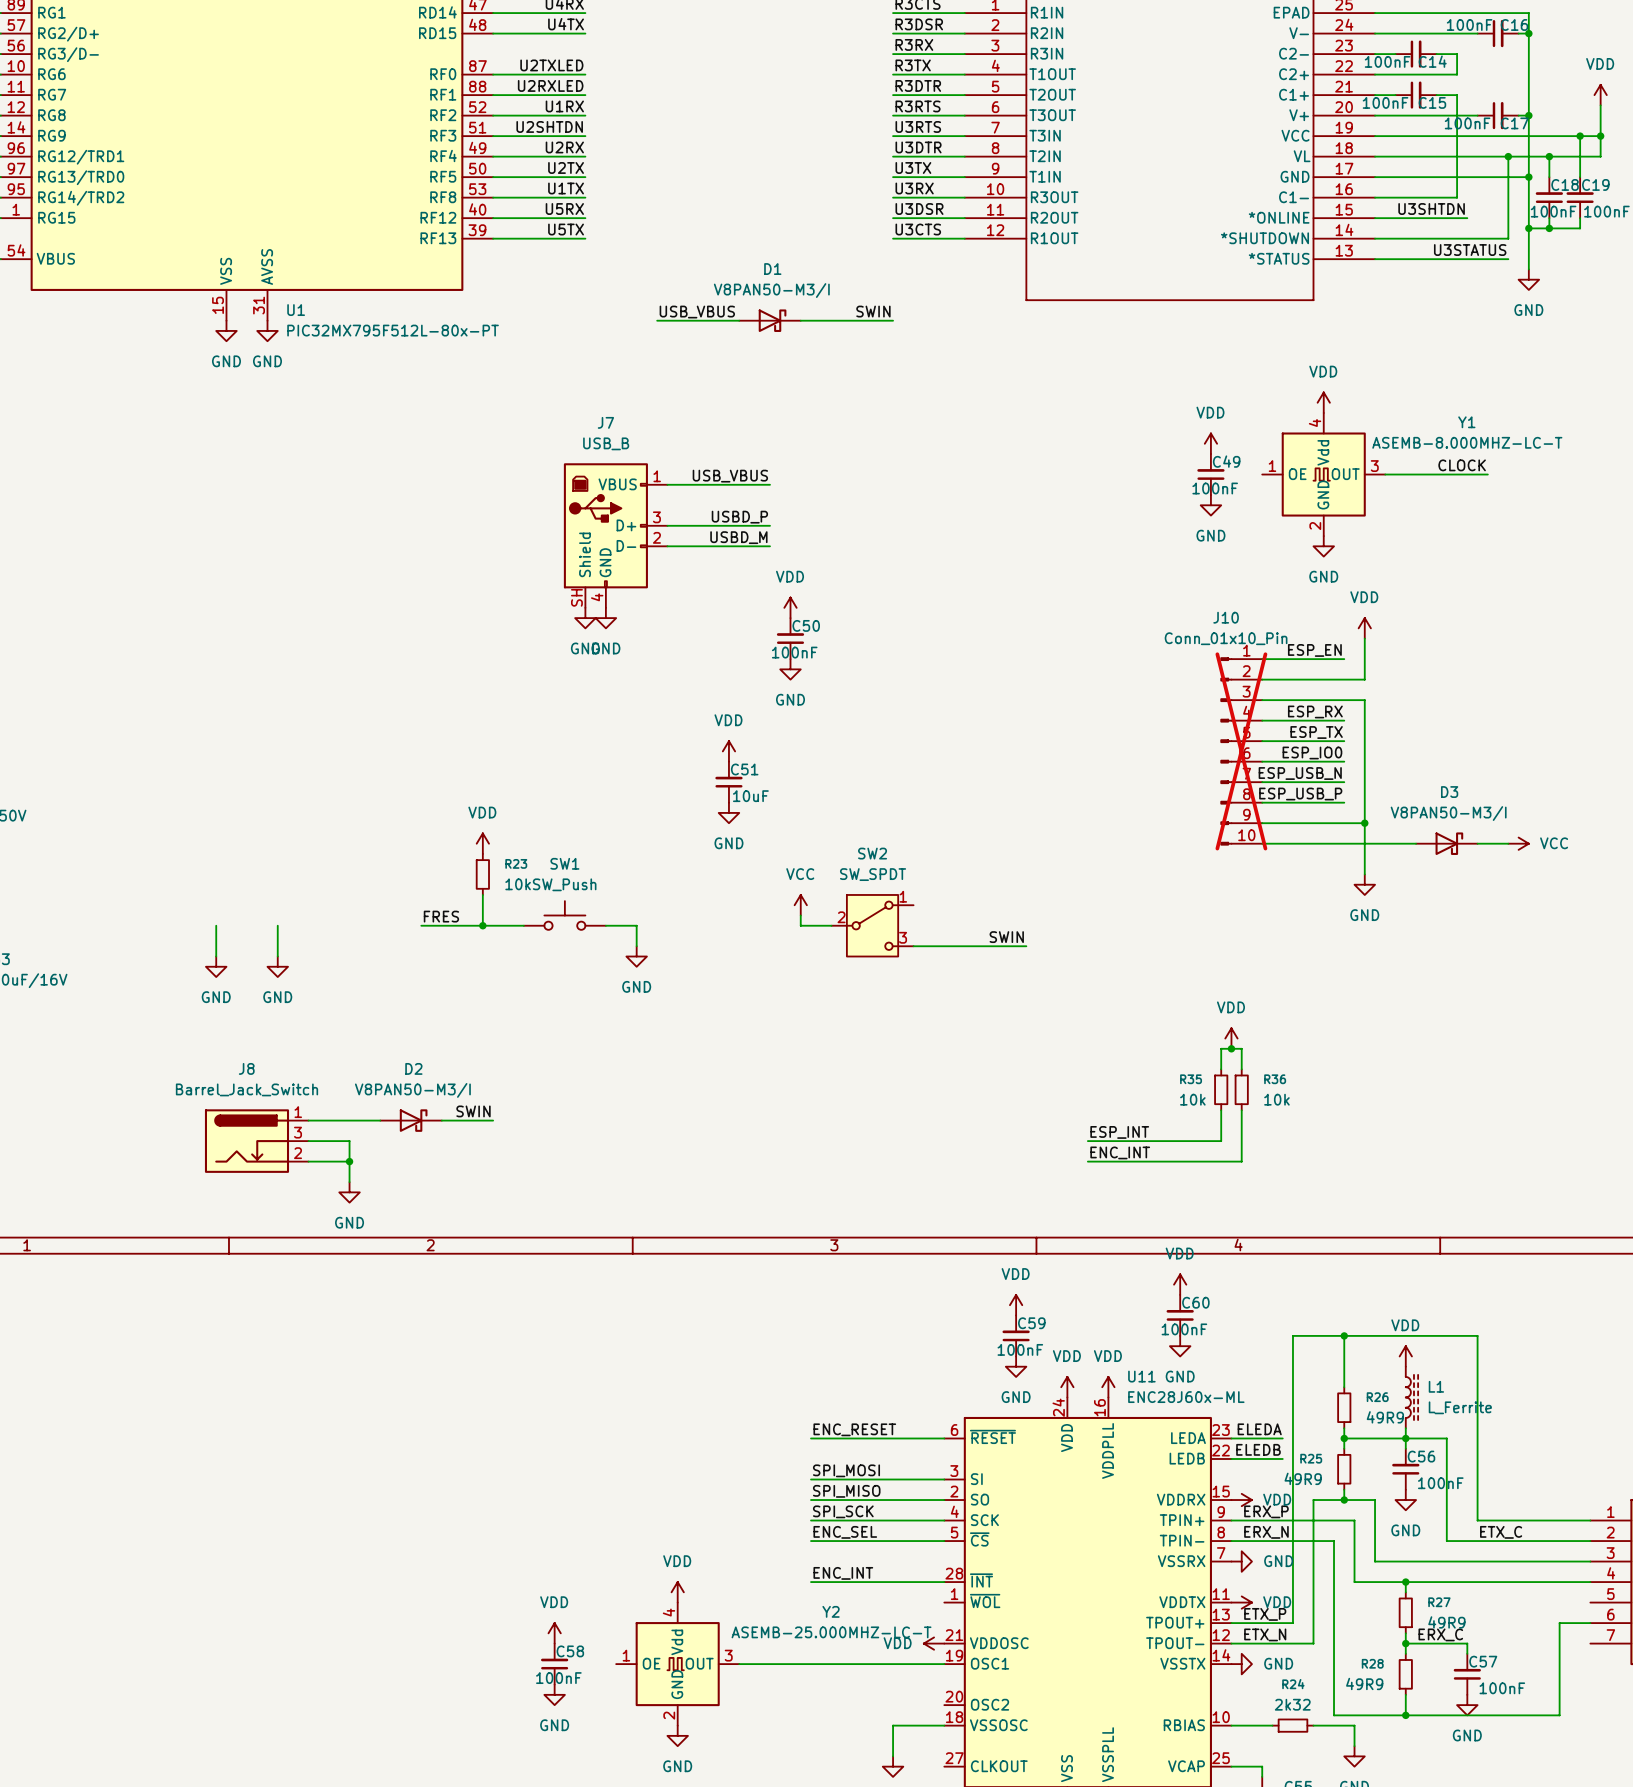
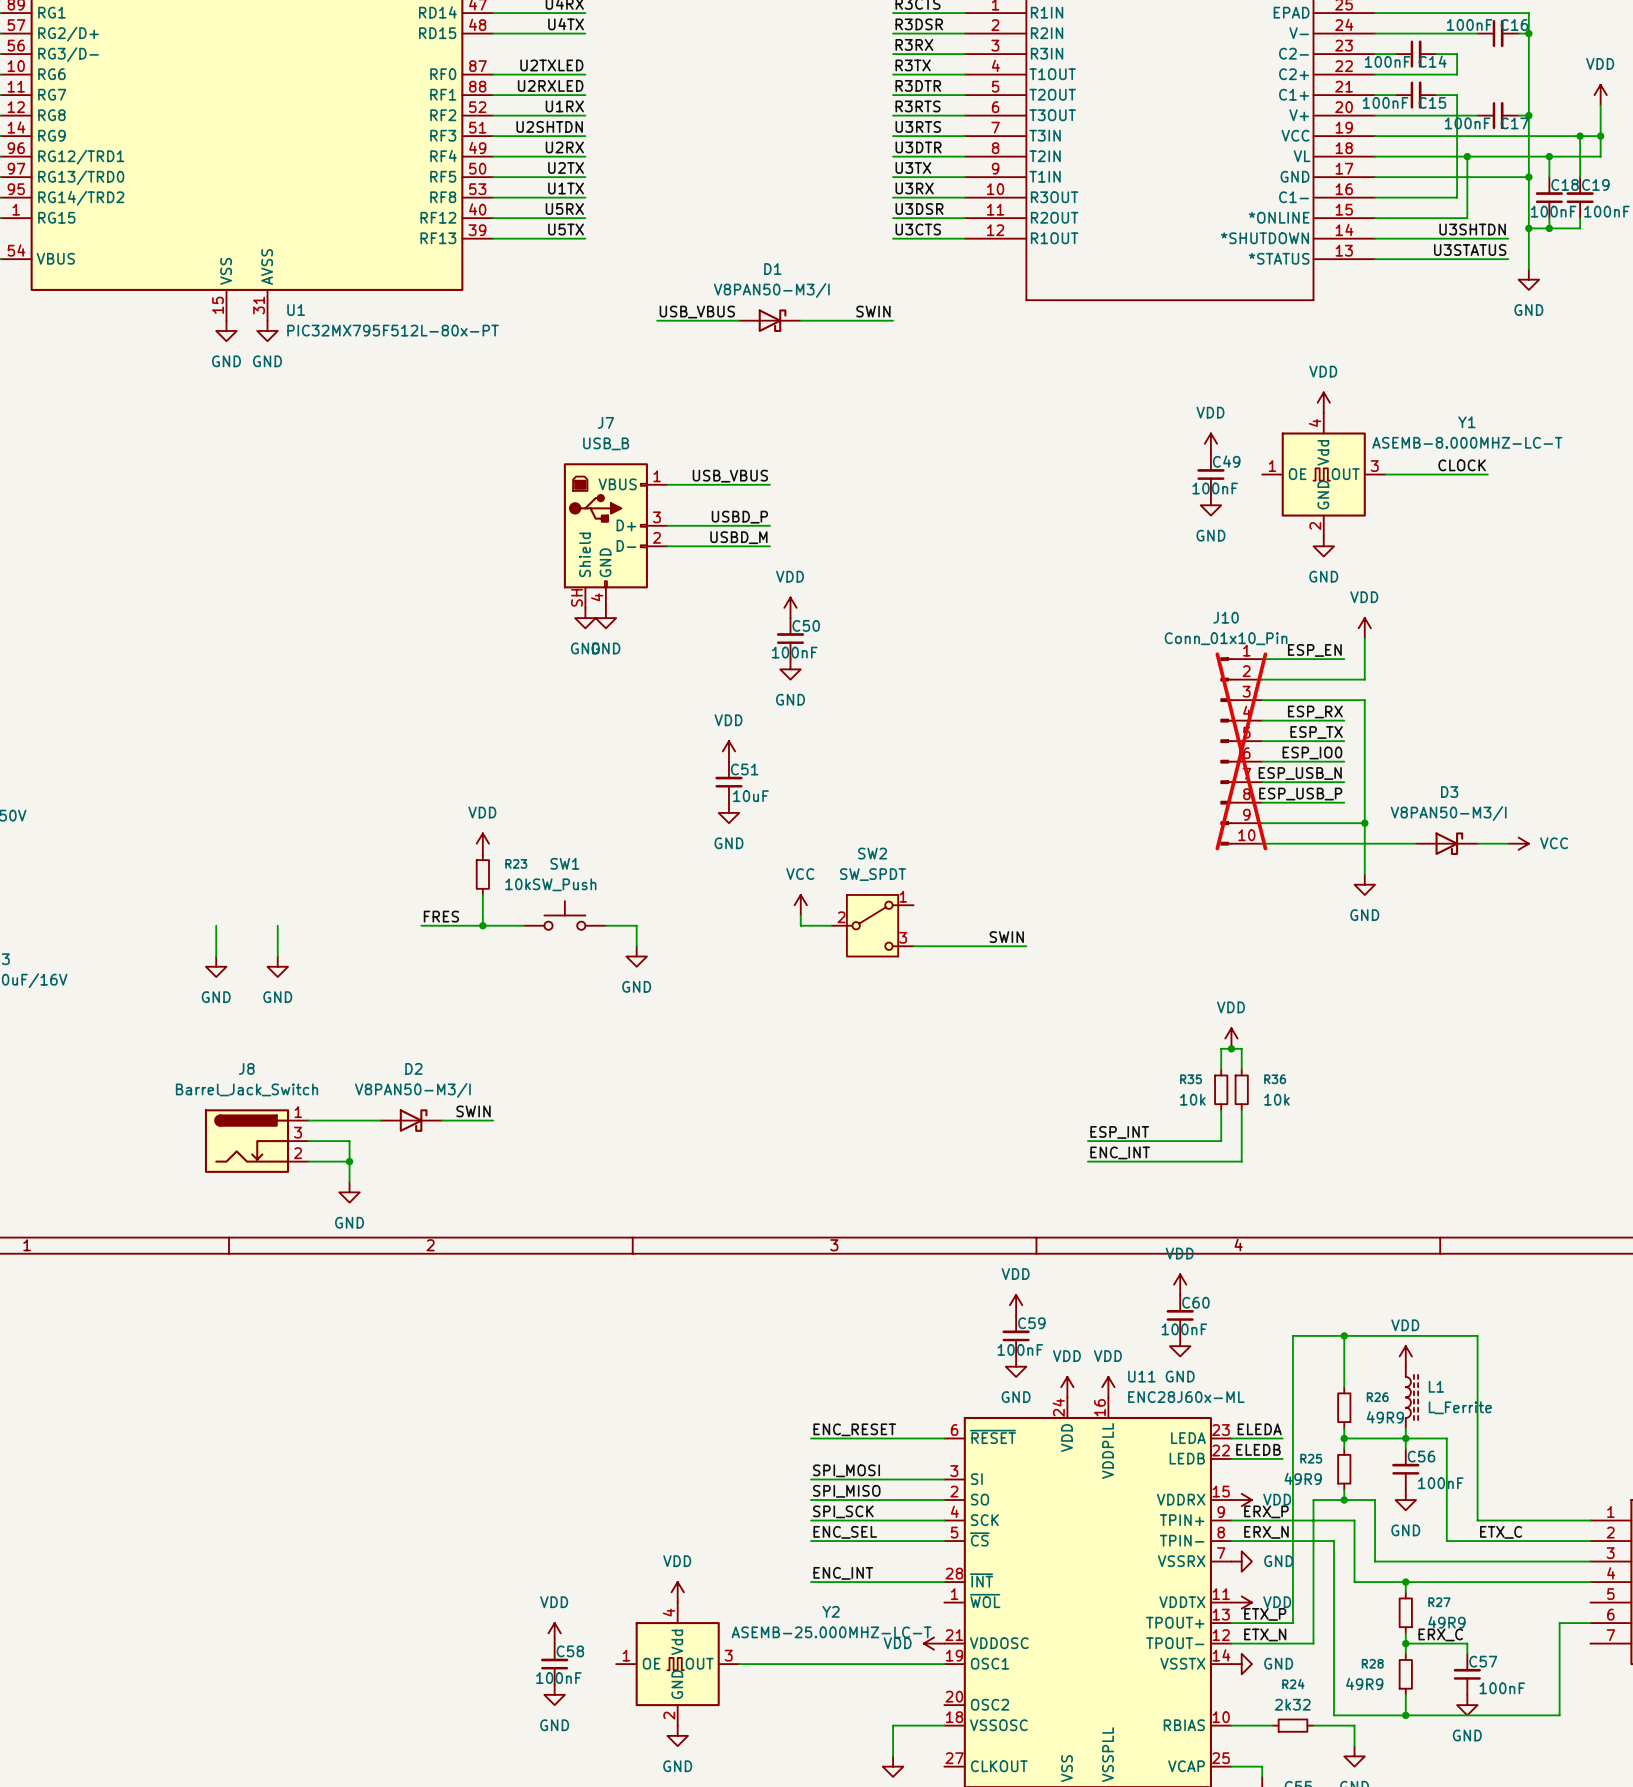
wire: none -> (1467, 156) (1467, 218)
wire: (1508, 156) (1508, 238) -> none
junction position: (1508, 156) -> (1467, 156)
label position: U3SHTDN (1431, 209) -> U3SHTDN (1472, 229)

